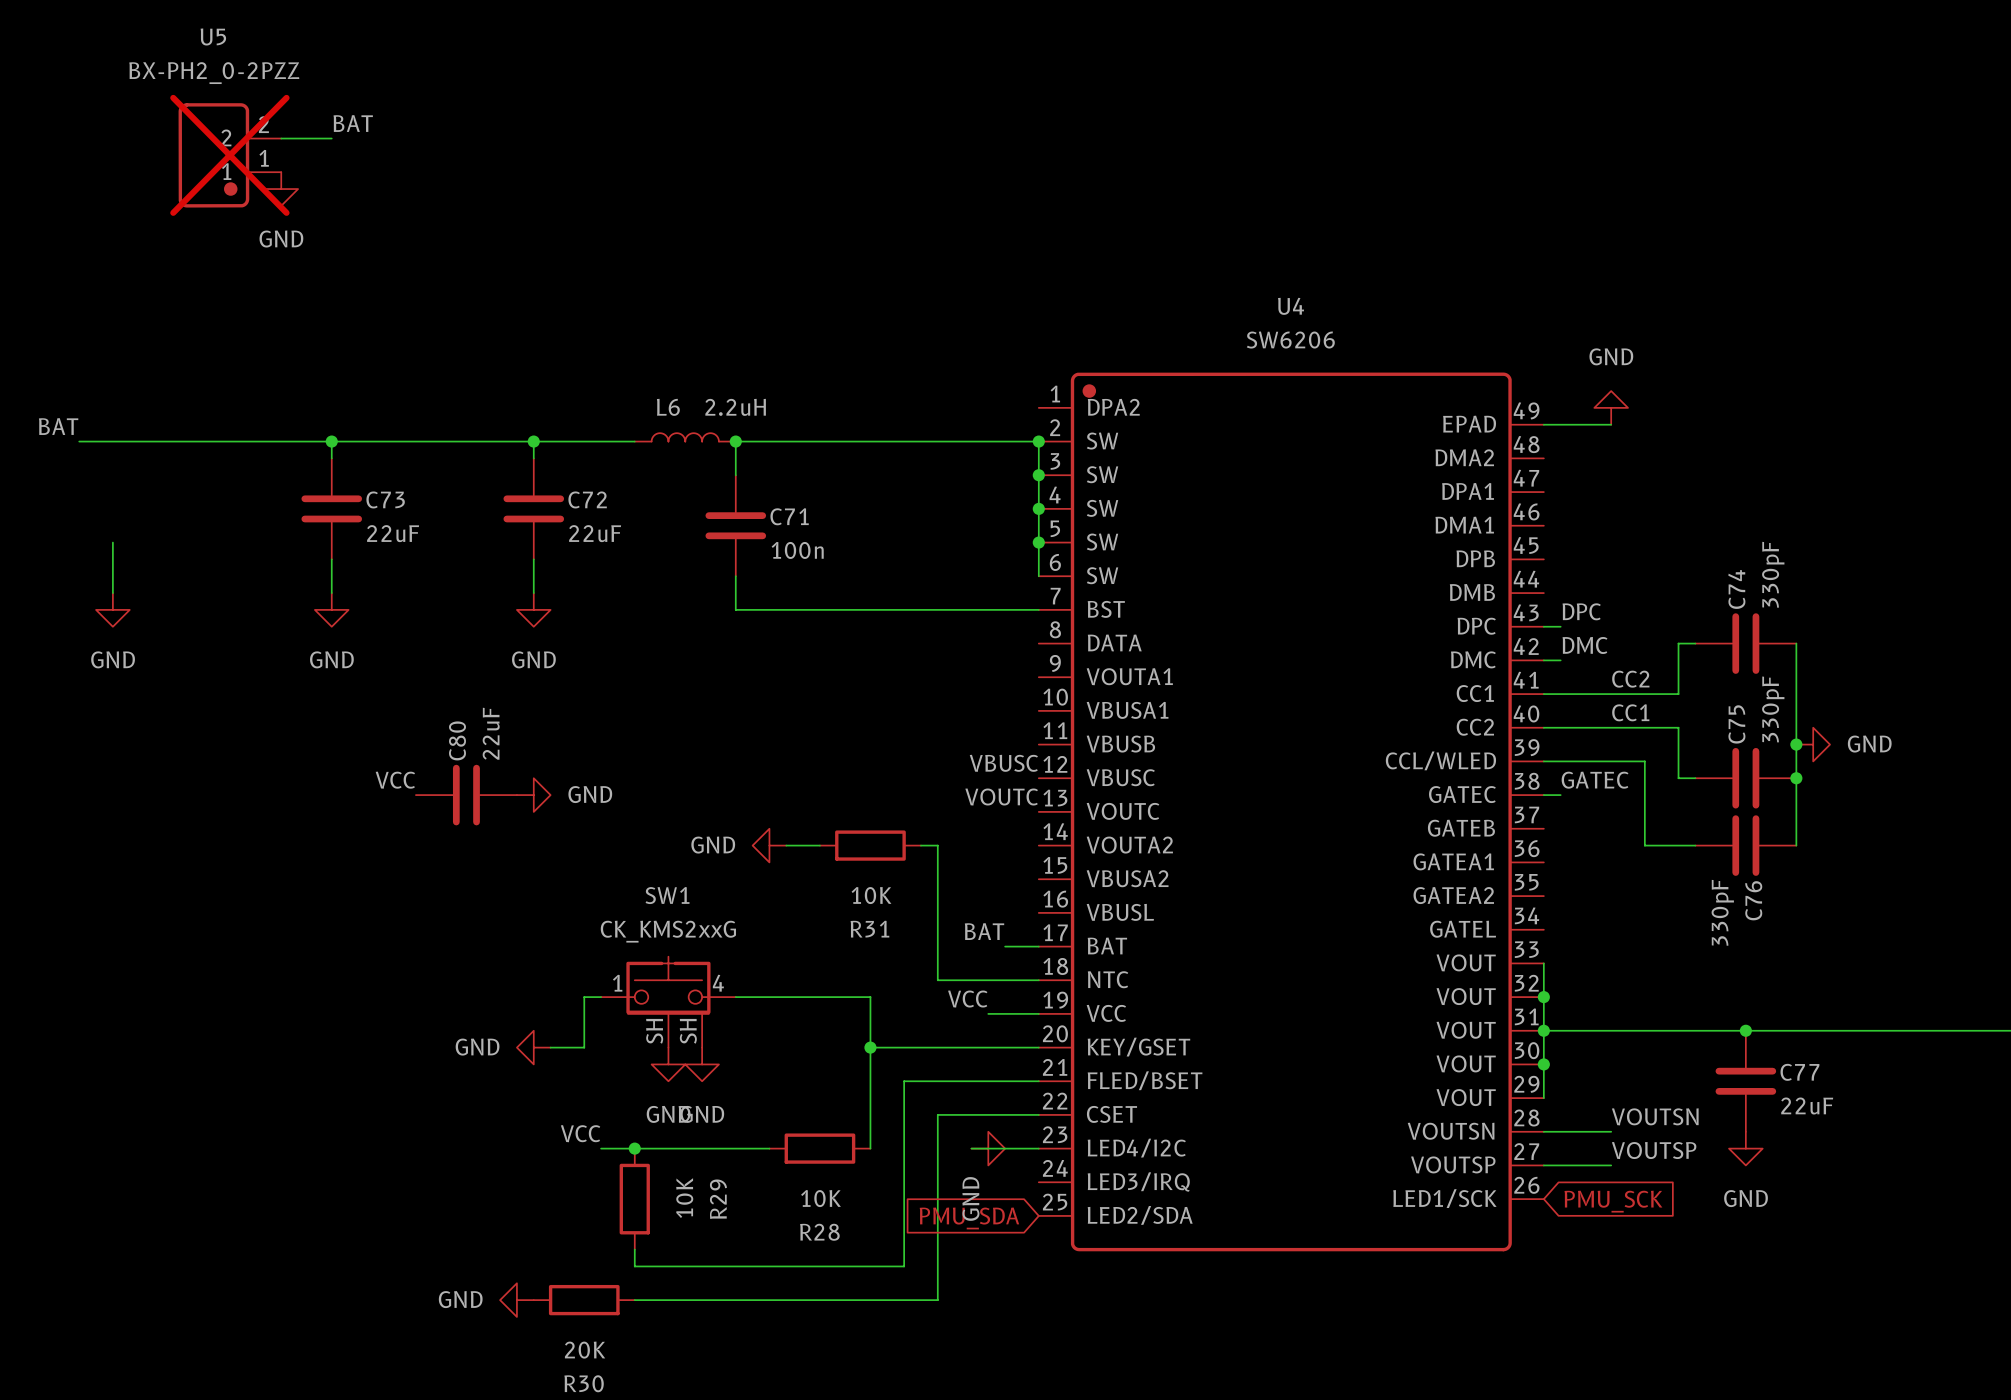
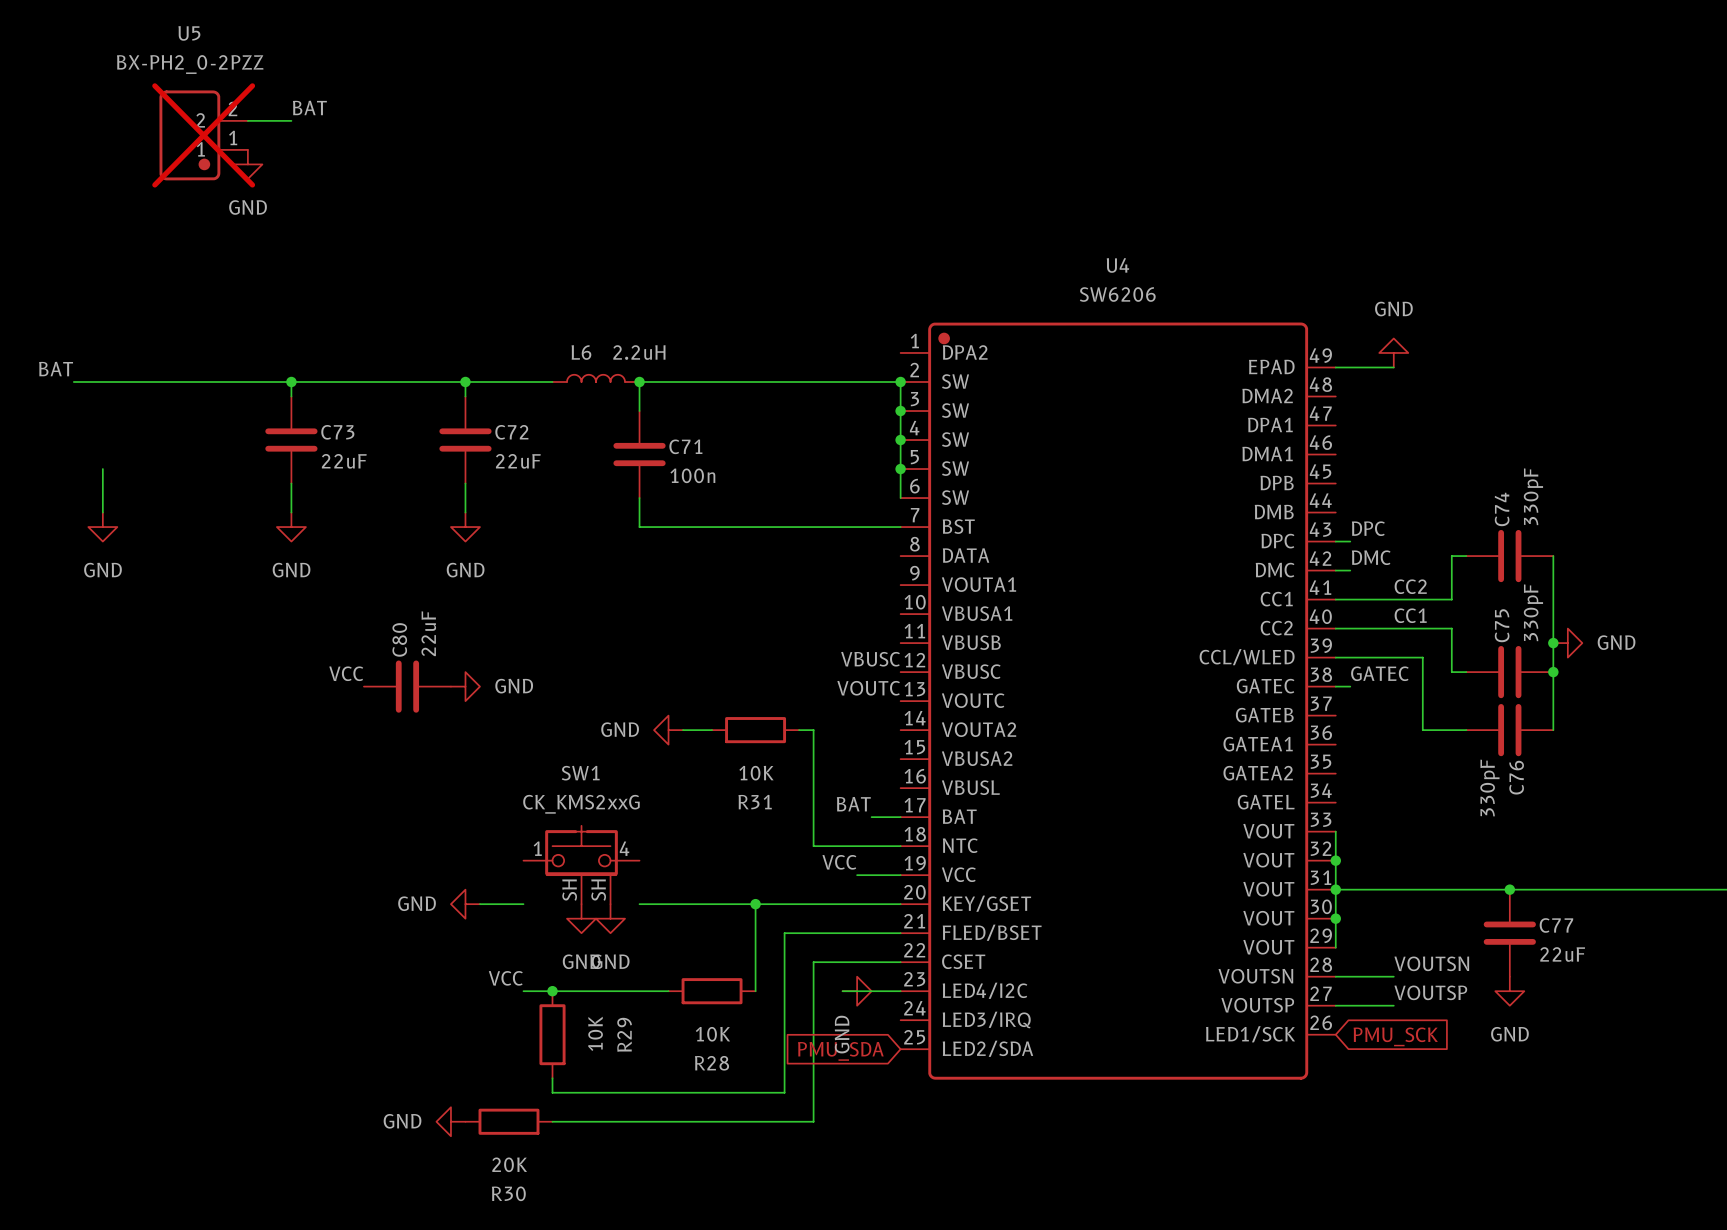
wire: (601, 997) (584, 997) (584, 1047) -> (523, 904) (508, 904)
wire: (735, 997) (870, 997) (870, 1047) -> (639, 904) (755, 904)

